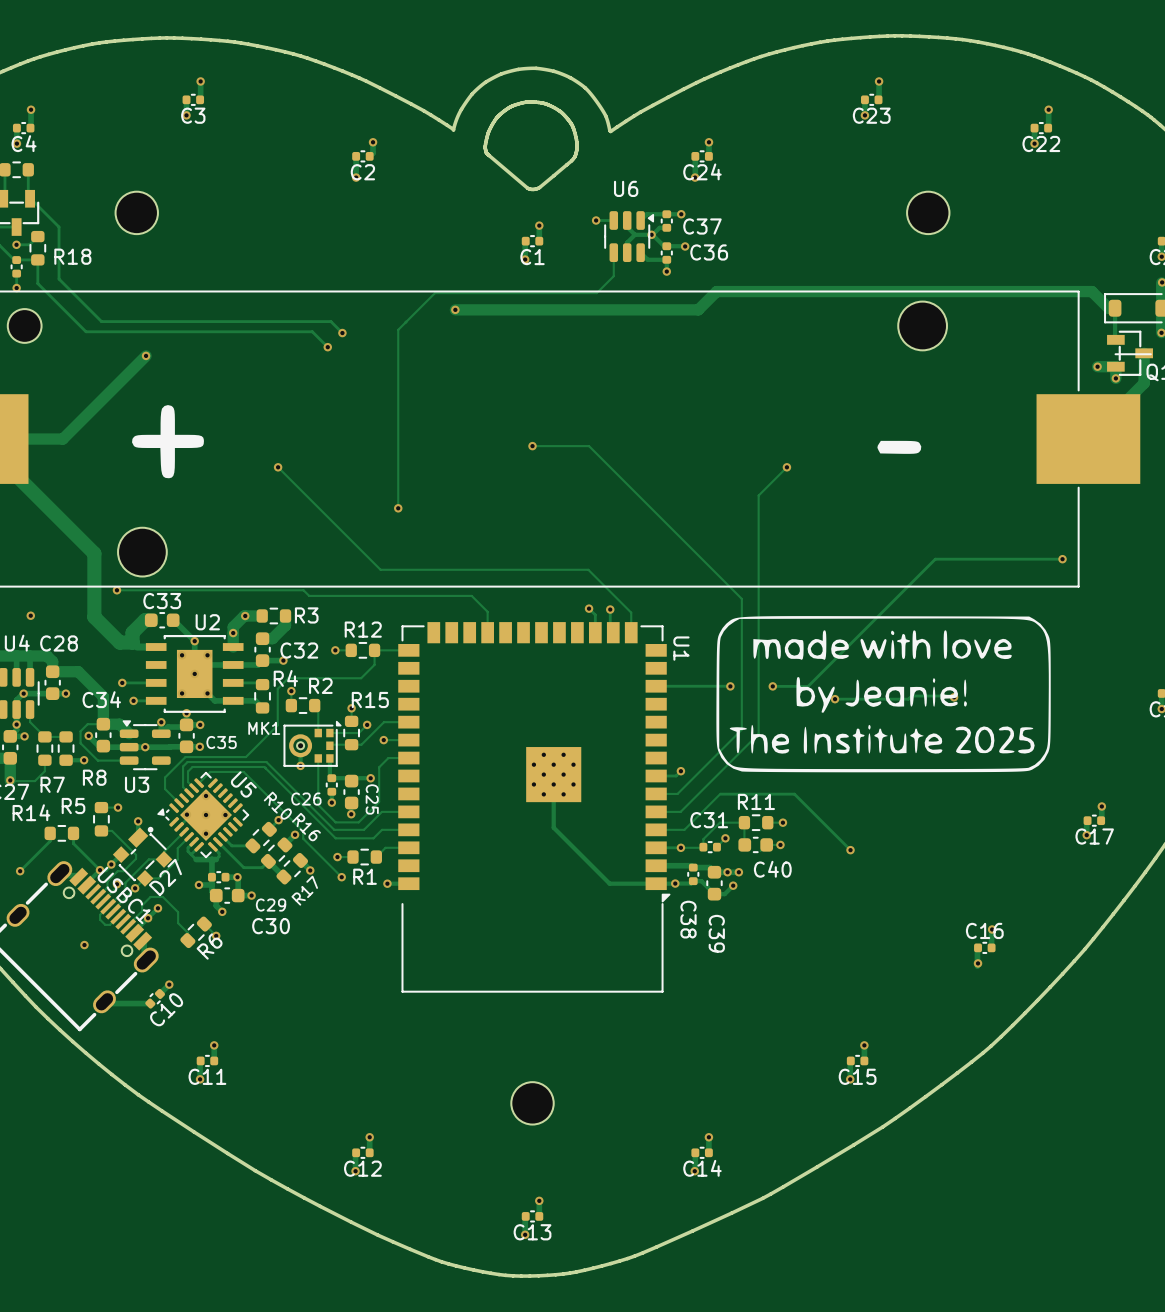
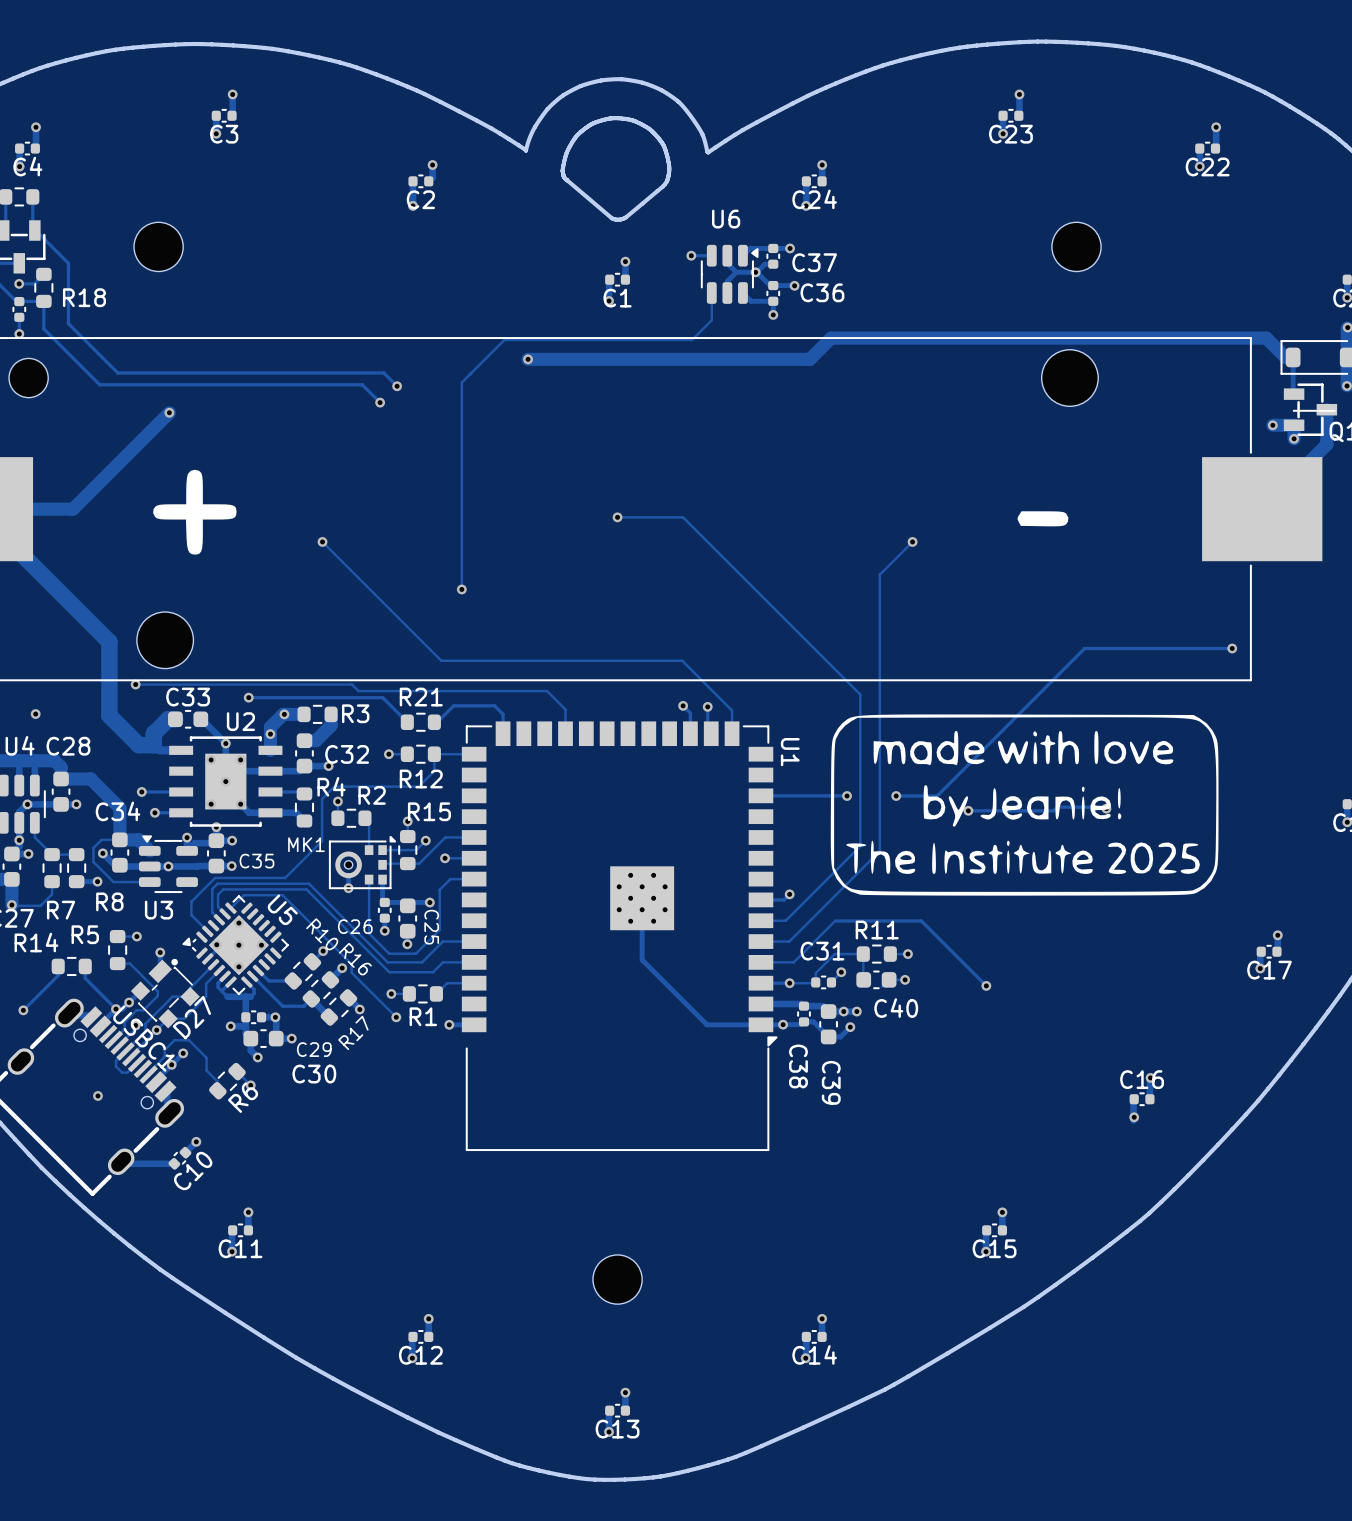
track: none -> (248, 697) (382, 697) (407, 722)
via: none -> (248, 697)
R21: none -> (420, 722)
track: none -> (434, 722) (437, 722) (453, 705) (494, 705) (503, 714) (503, 733)
R12 name position: R12 (363, 629) -> R12 (421, 779)

